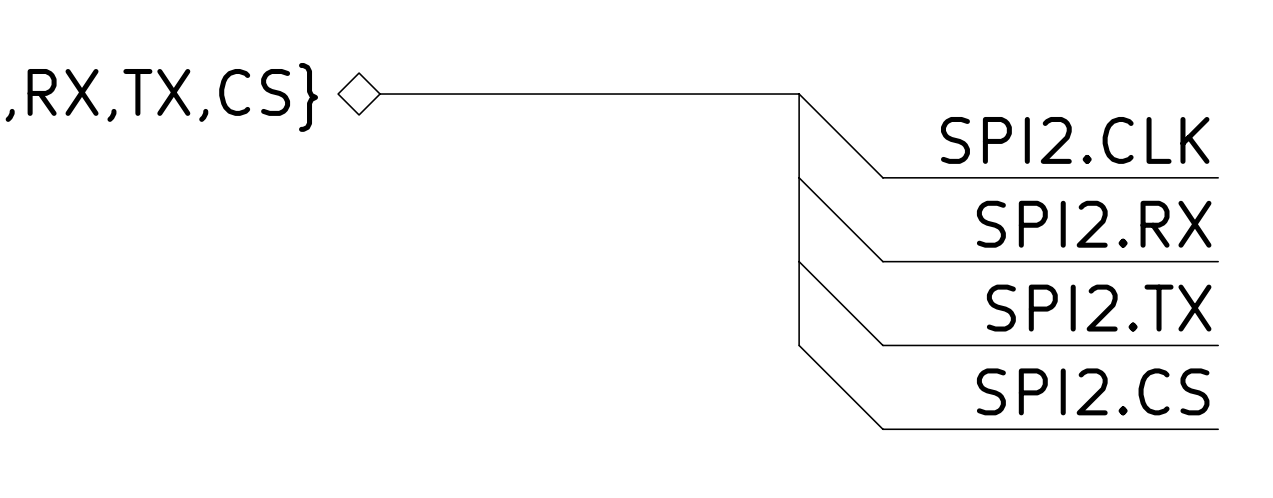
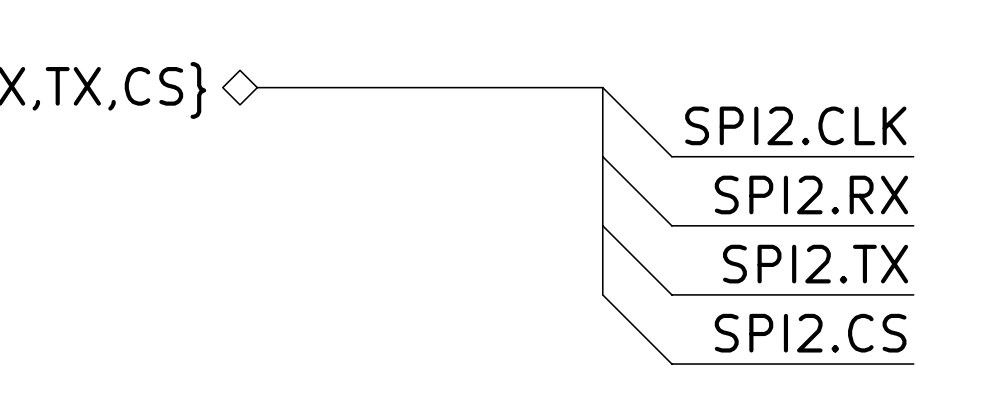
label position: SPI2.CLK (1075, 140) -> SPI2.CLK (795, 125)
wire: (1176, 177) (1218, 177) -> none
label position: SPI2.RX (1094, 224) -> SPI2.RX (811, 194)
wire: (1176, 261) (1218, 261) -> none
label position: SPI2.TX (1099, 308) -> SPI2.TX (815, 264)
wire: (1176, 345) (1218, 345) -> none
label position: SPI2.CS (1093, 391) -> SPI2.CS (810, 333)
wire: (1176, 429) (1218, 429) -> none

